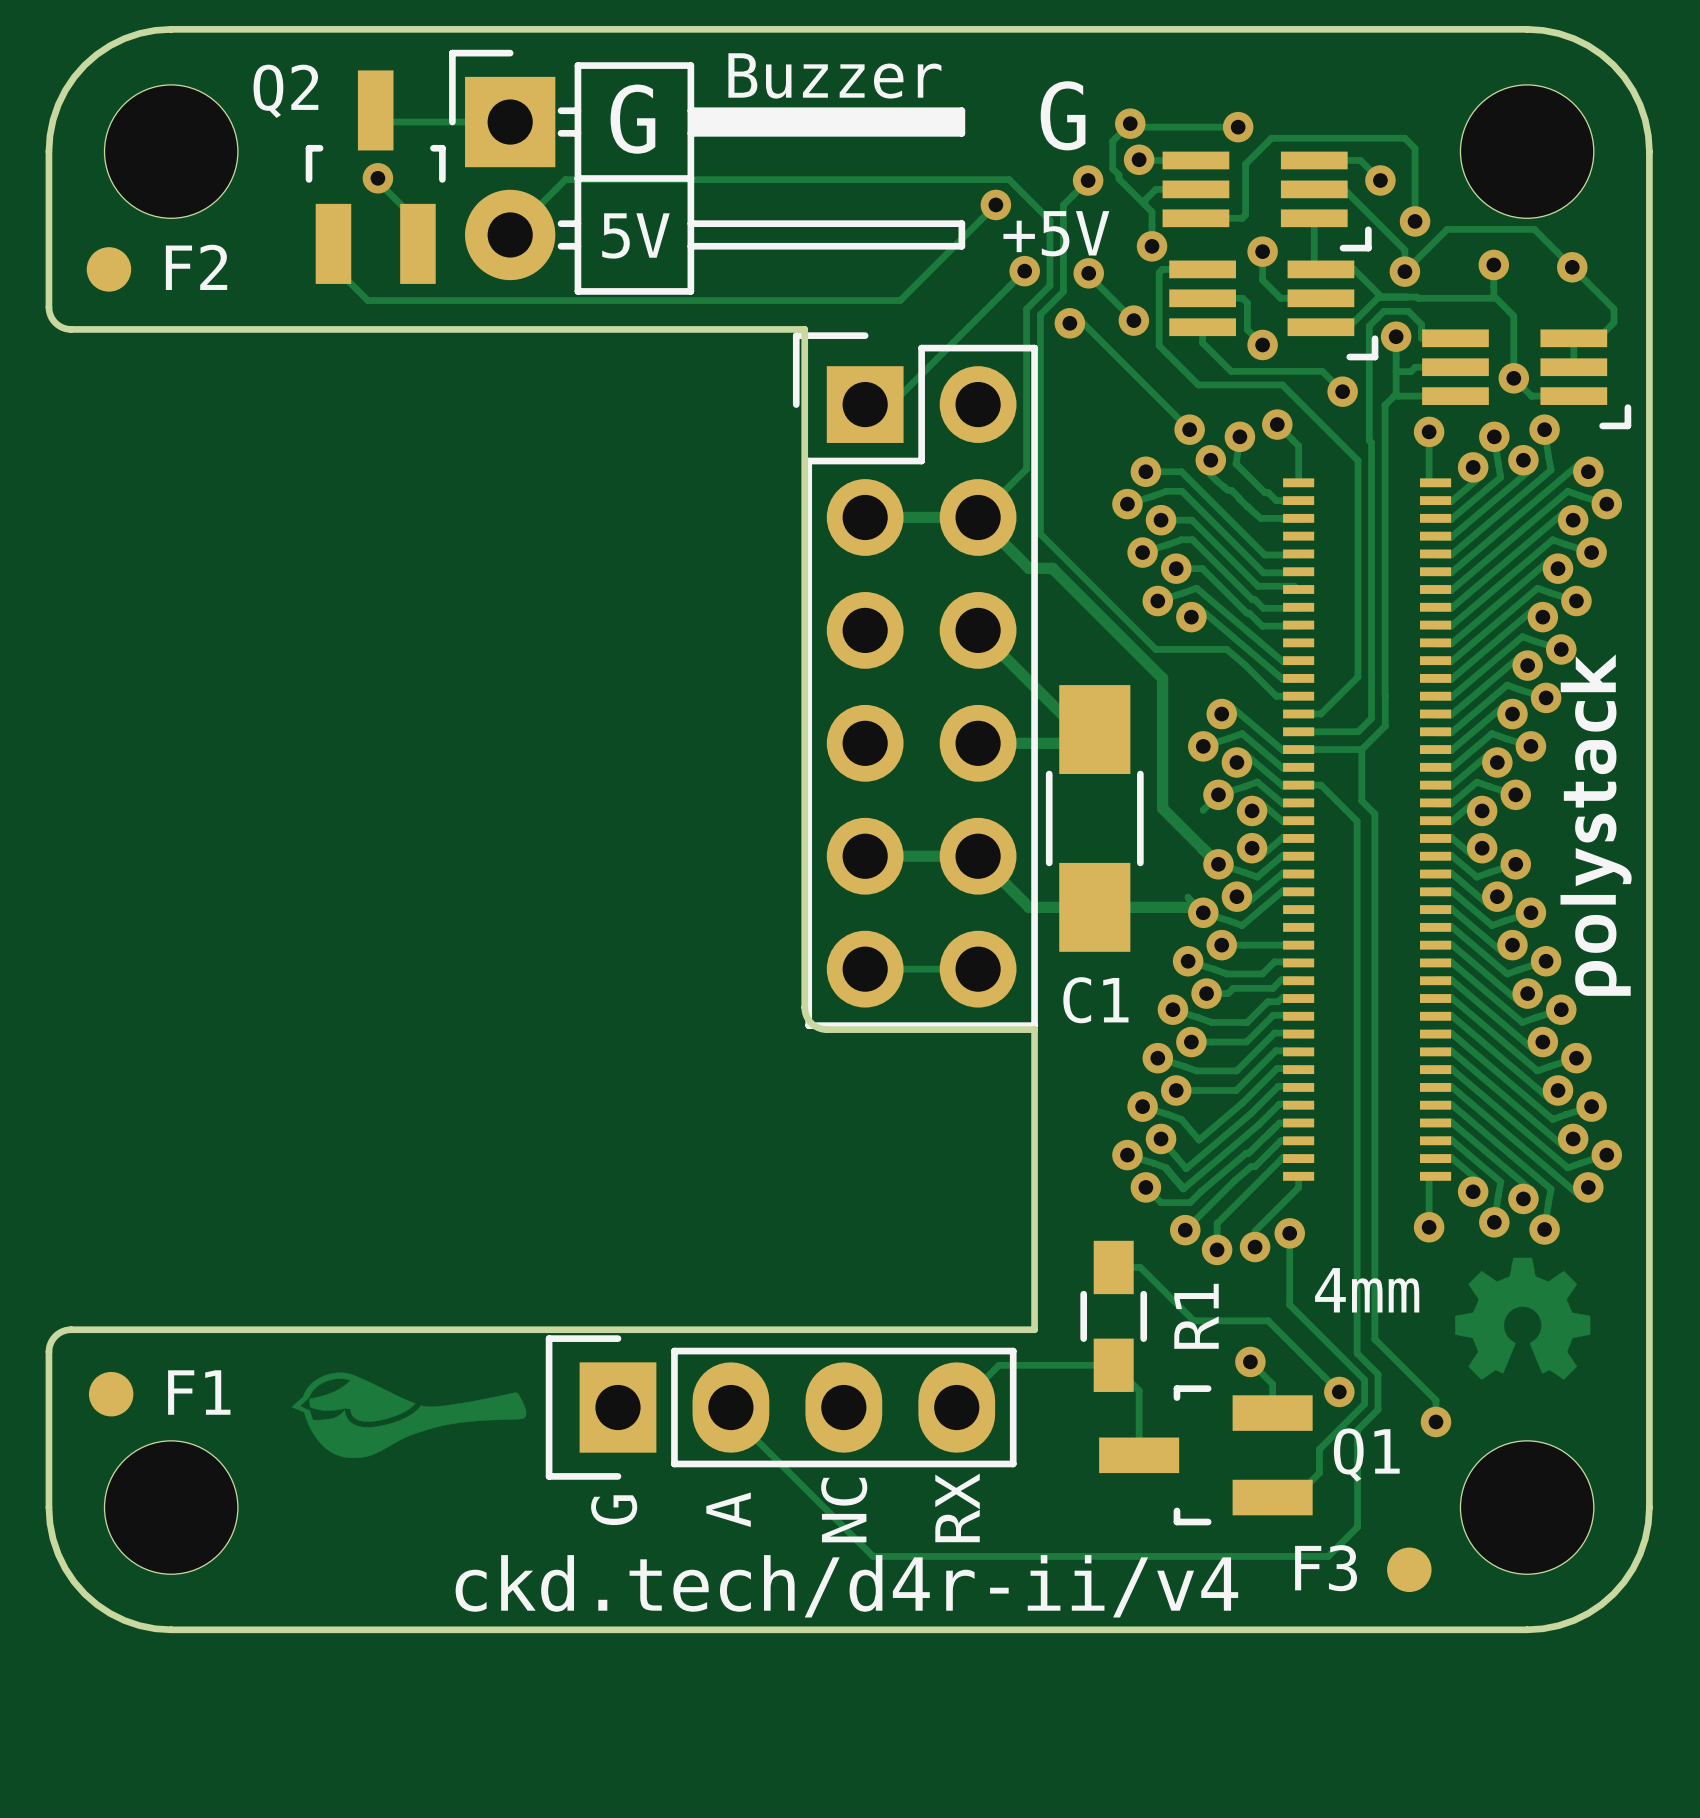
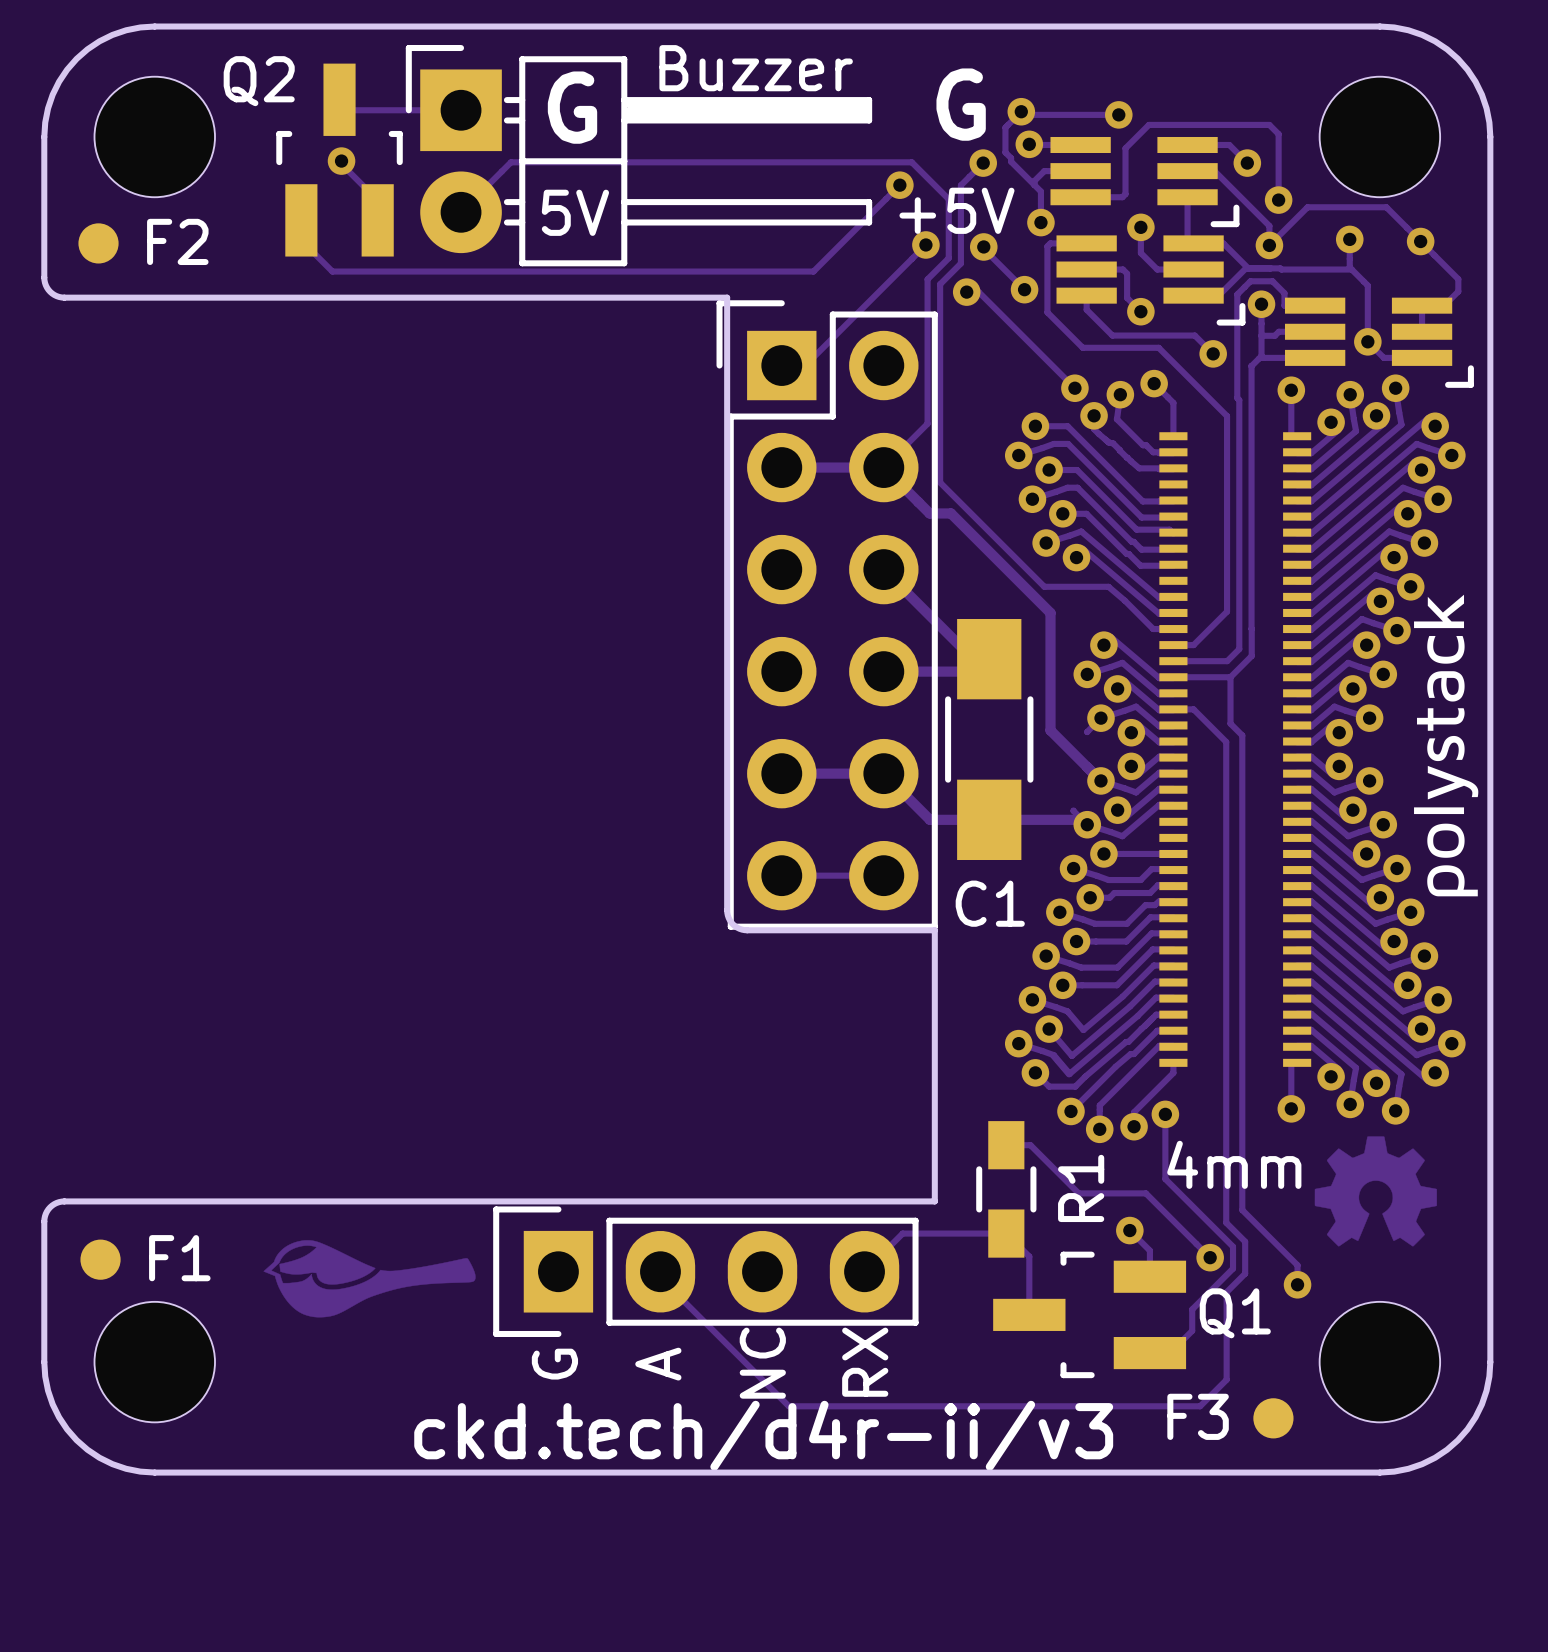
drawing shape: [1560, 654, 1632, 996] -> [1414, 594, 1479, 897]
text: ckd.tech/d4r-ii/v4 (846, 1586) -> ckd.tech/d4r-ii/v3 (763, 1435)

